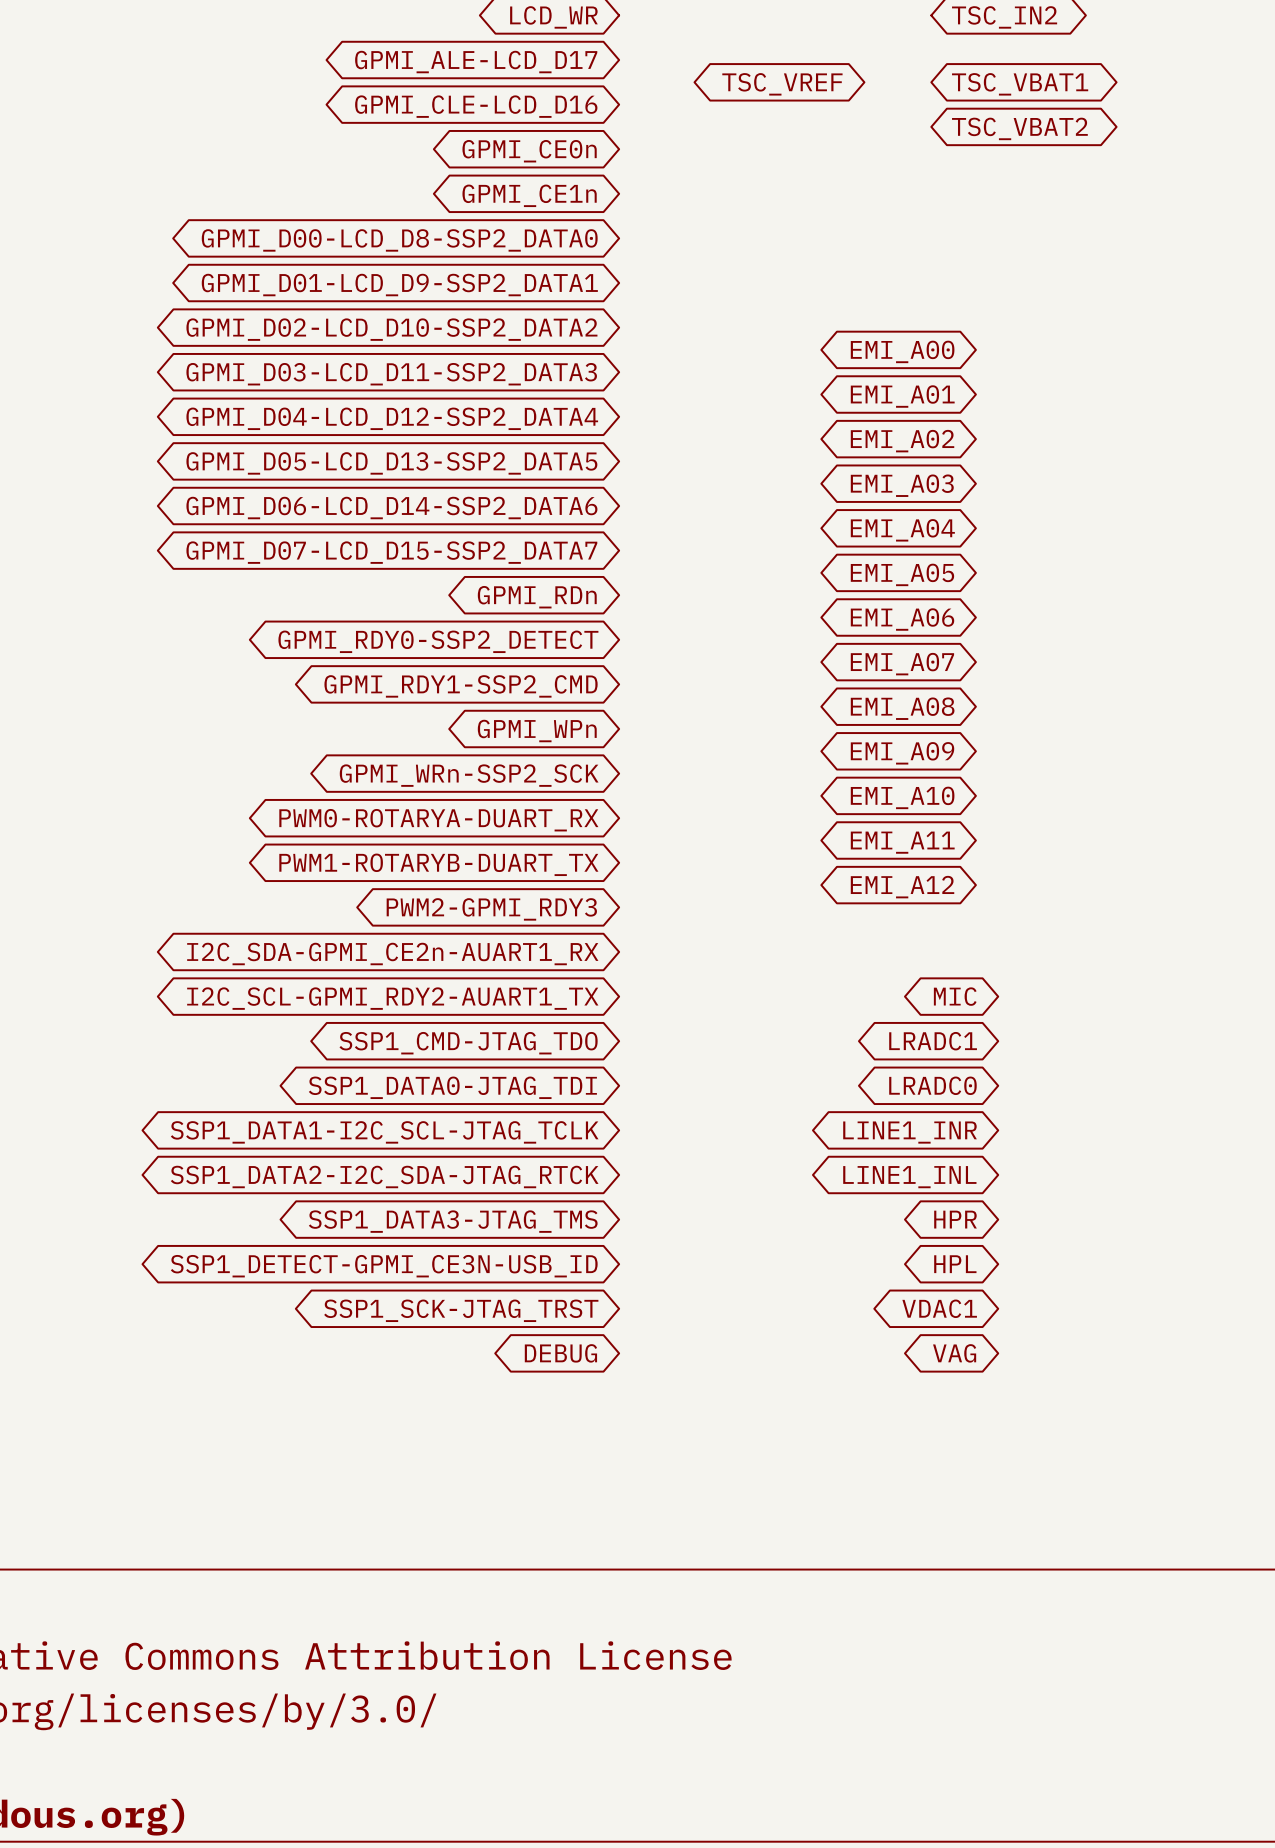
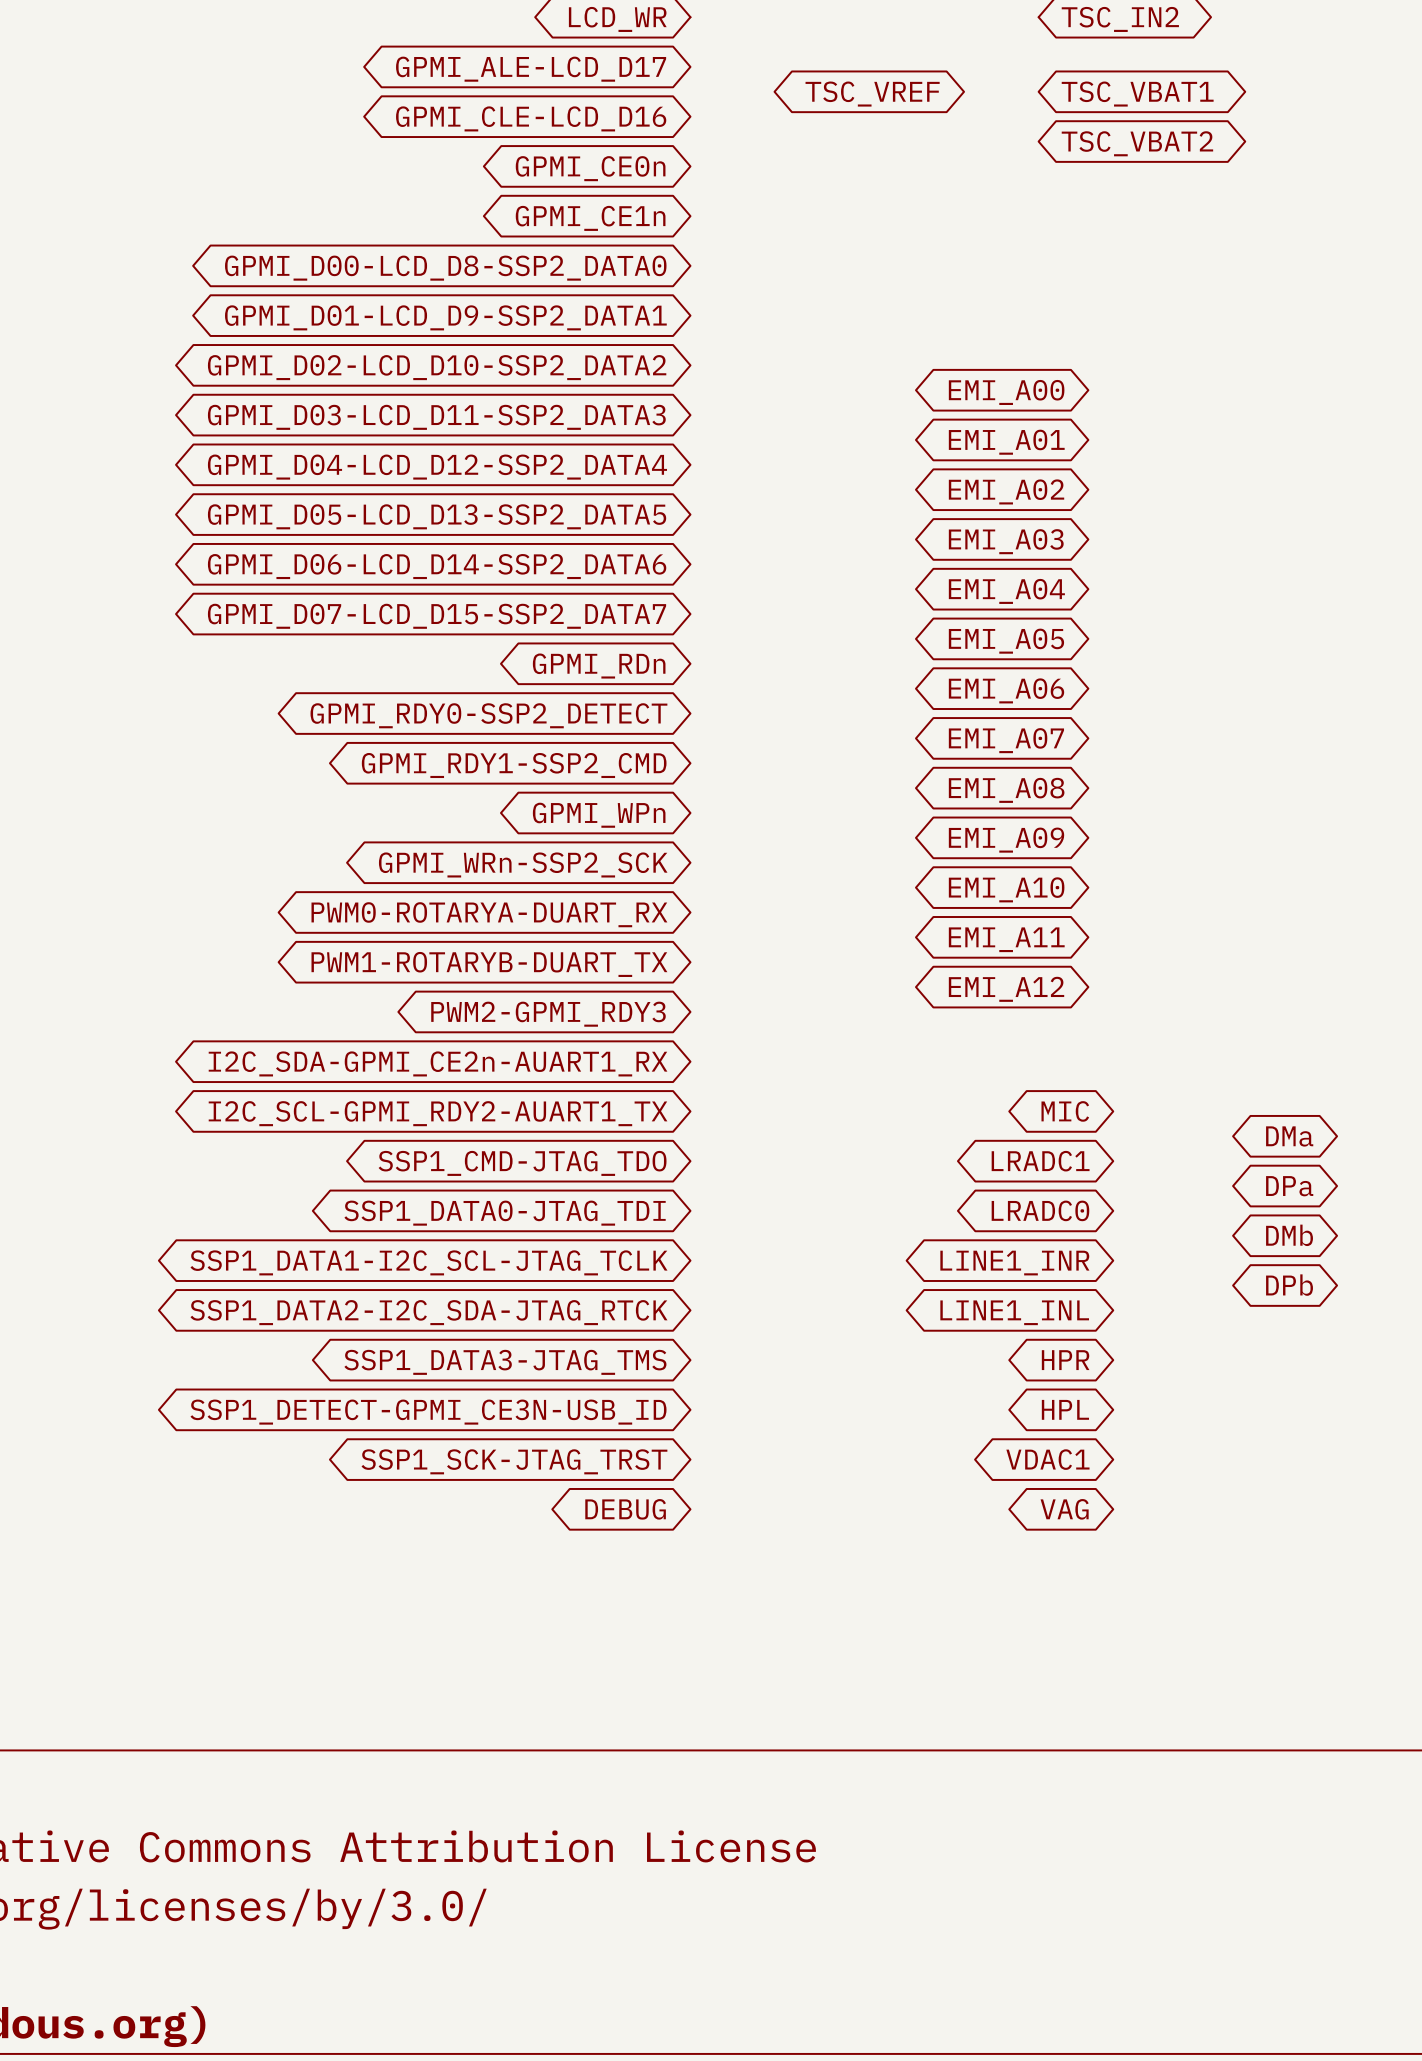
global label: none -> DMa (1289, 1136)
global label: none -> DPa (1289, 1186)
global label: none -> DMb (1289, 1235)
global label: none -> DPb (1289, 1285)

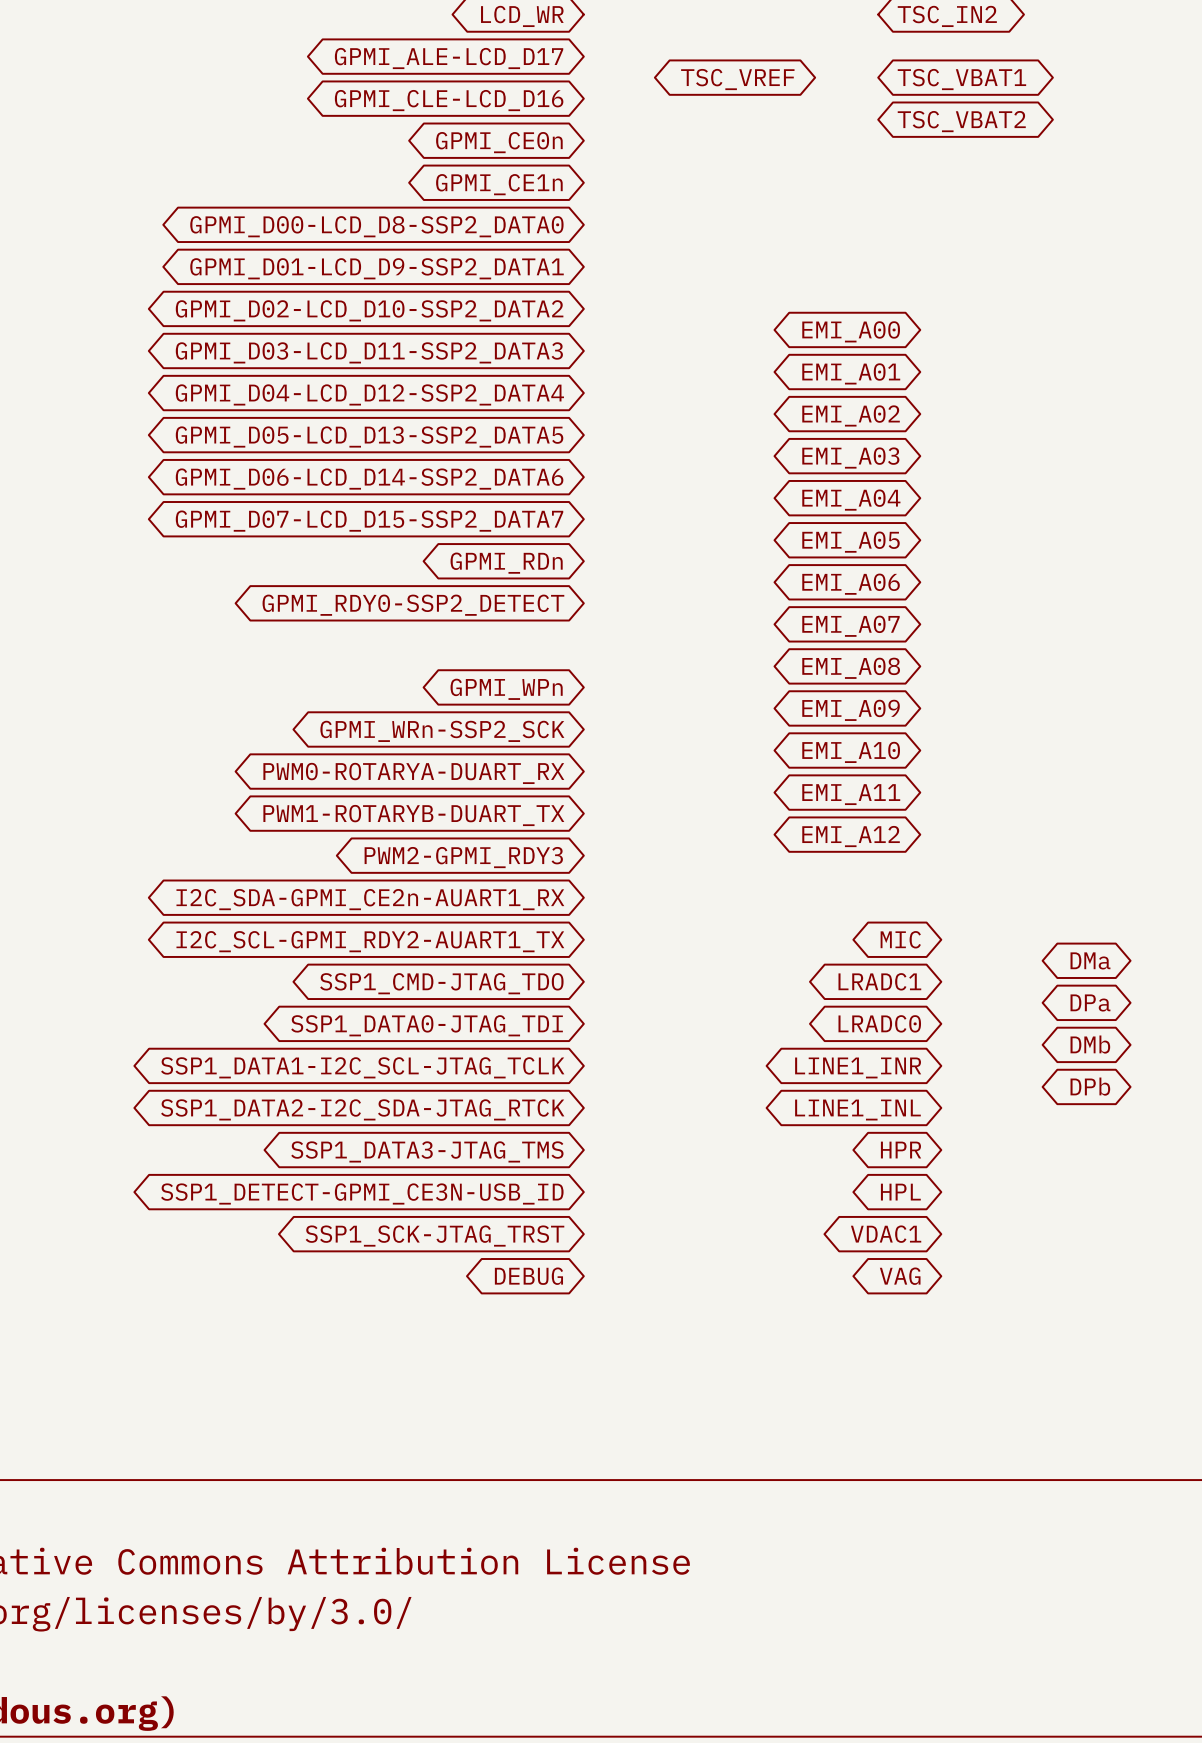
global label: GPMI_RDY1-SSP2_CMD (514, 765) -> none

